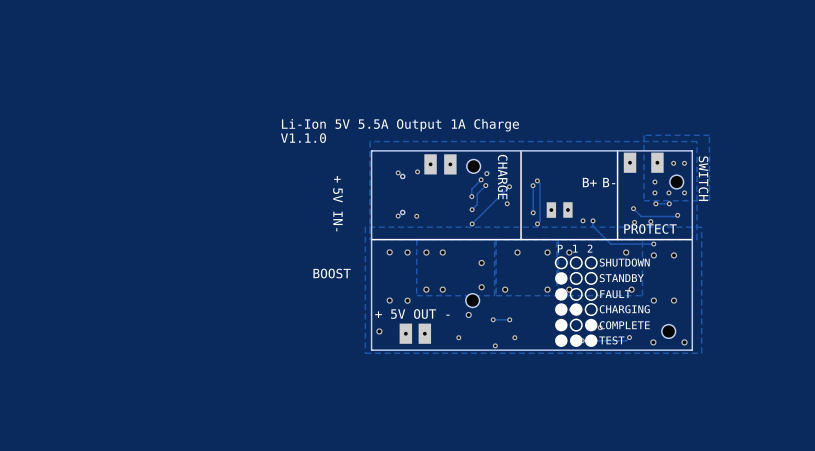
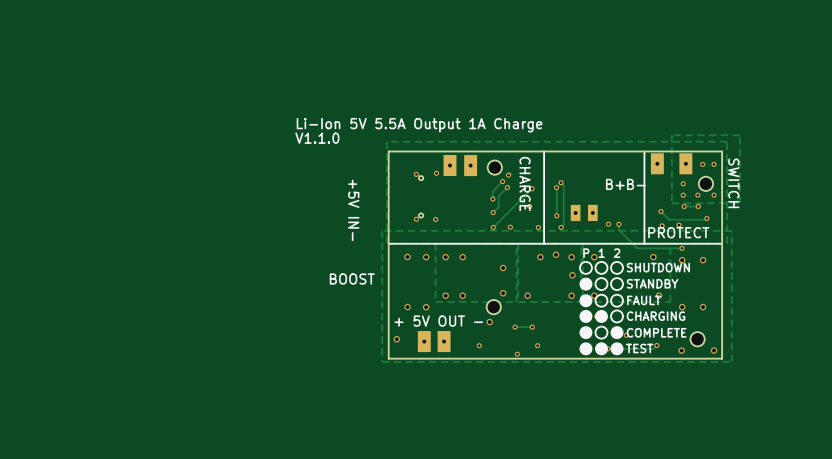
via: none -> (510, 227)
via: none -> (538, 227)
via: none -> (555, 254)
via: none -> (572, 275)

